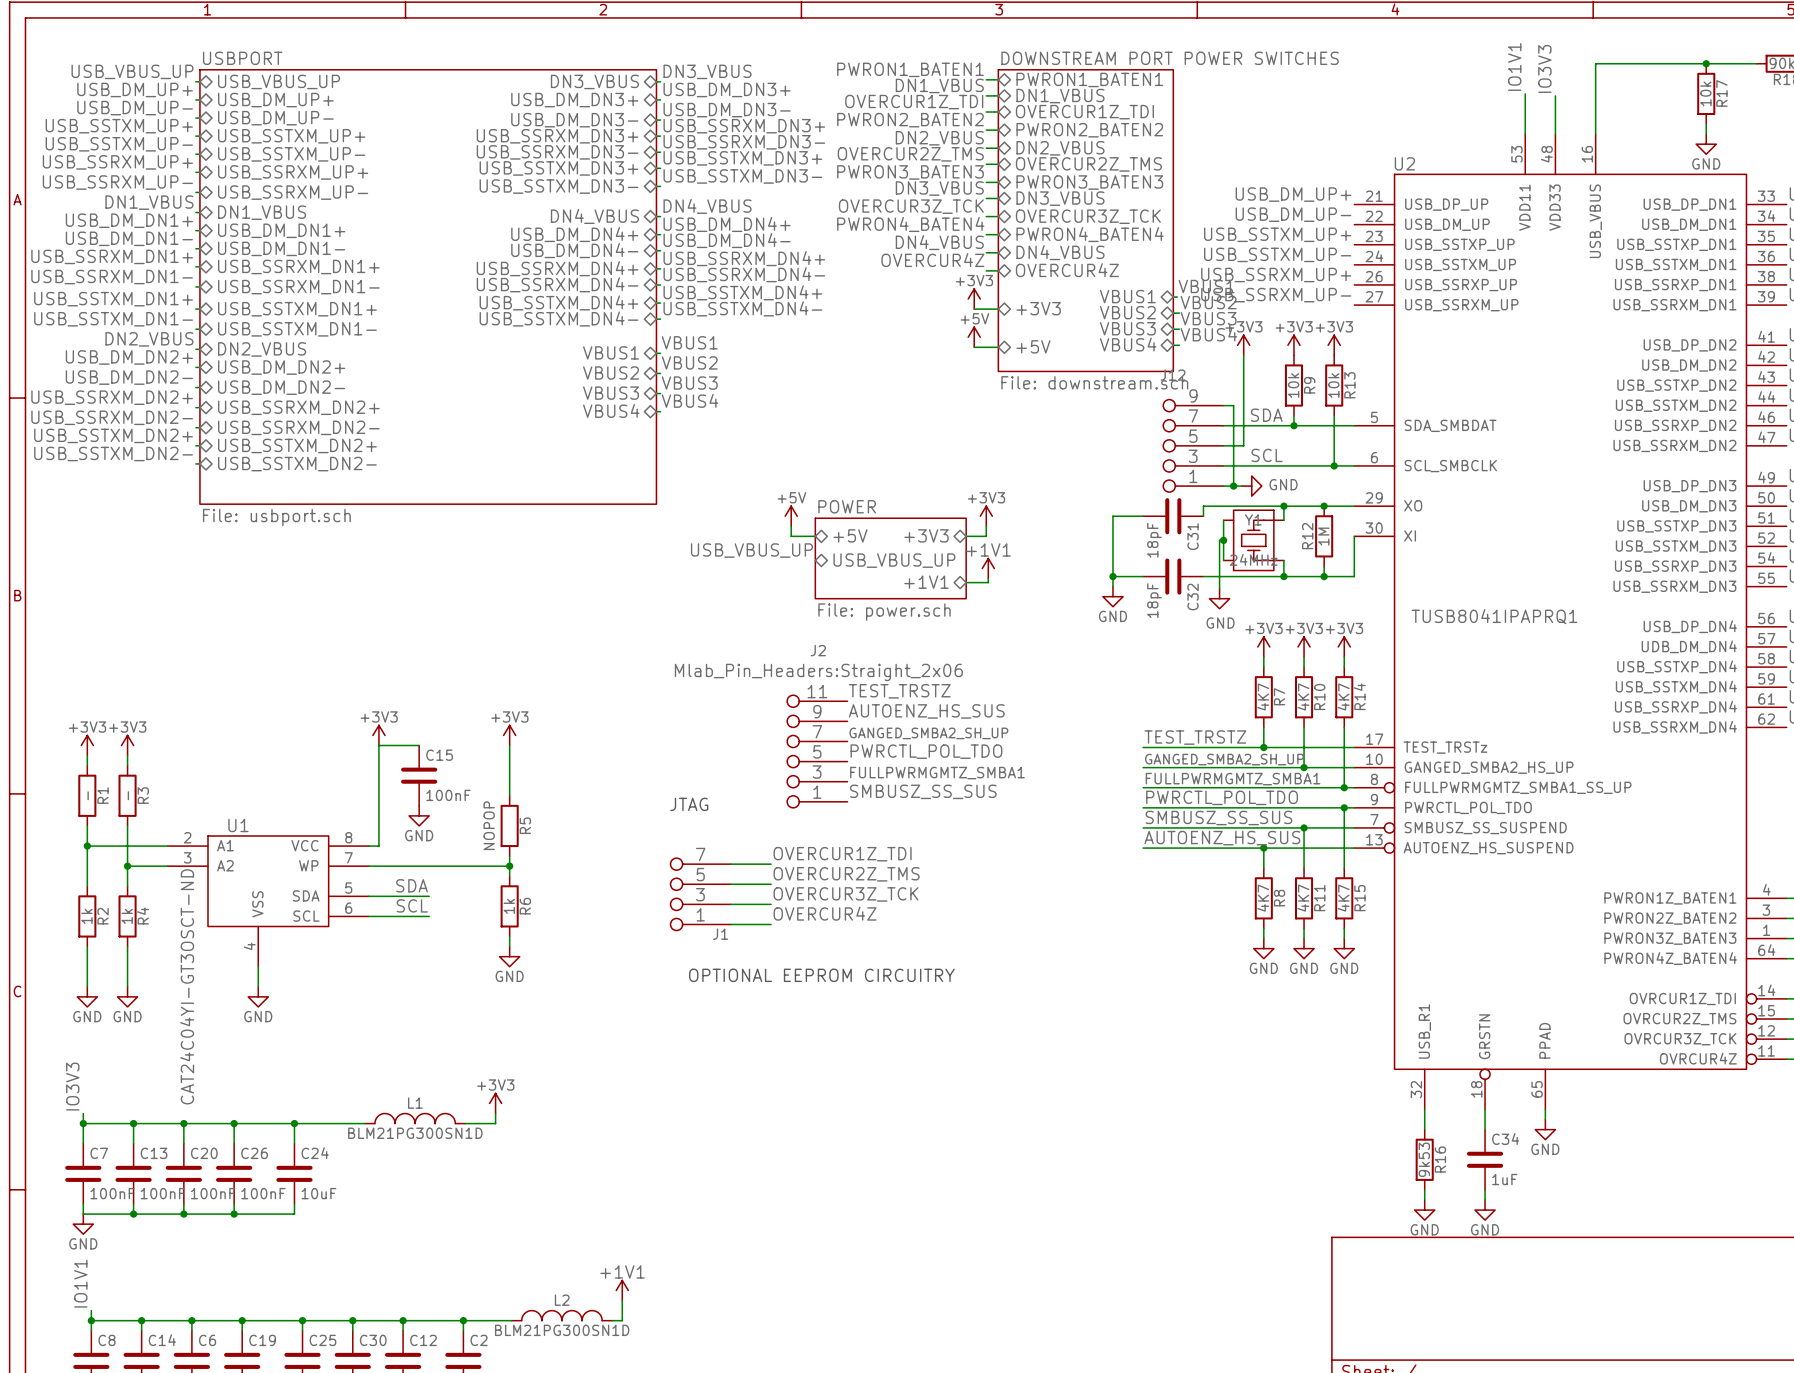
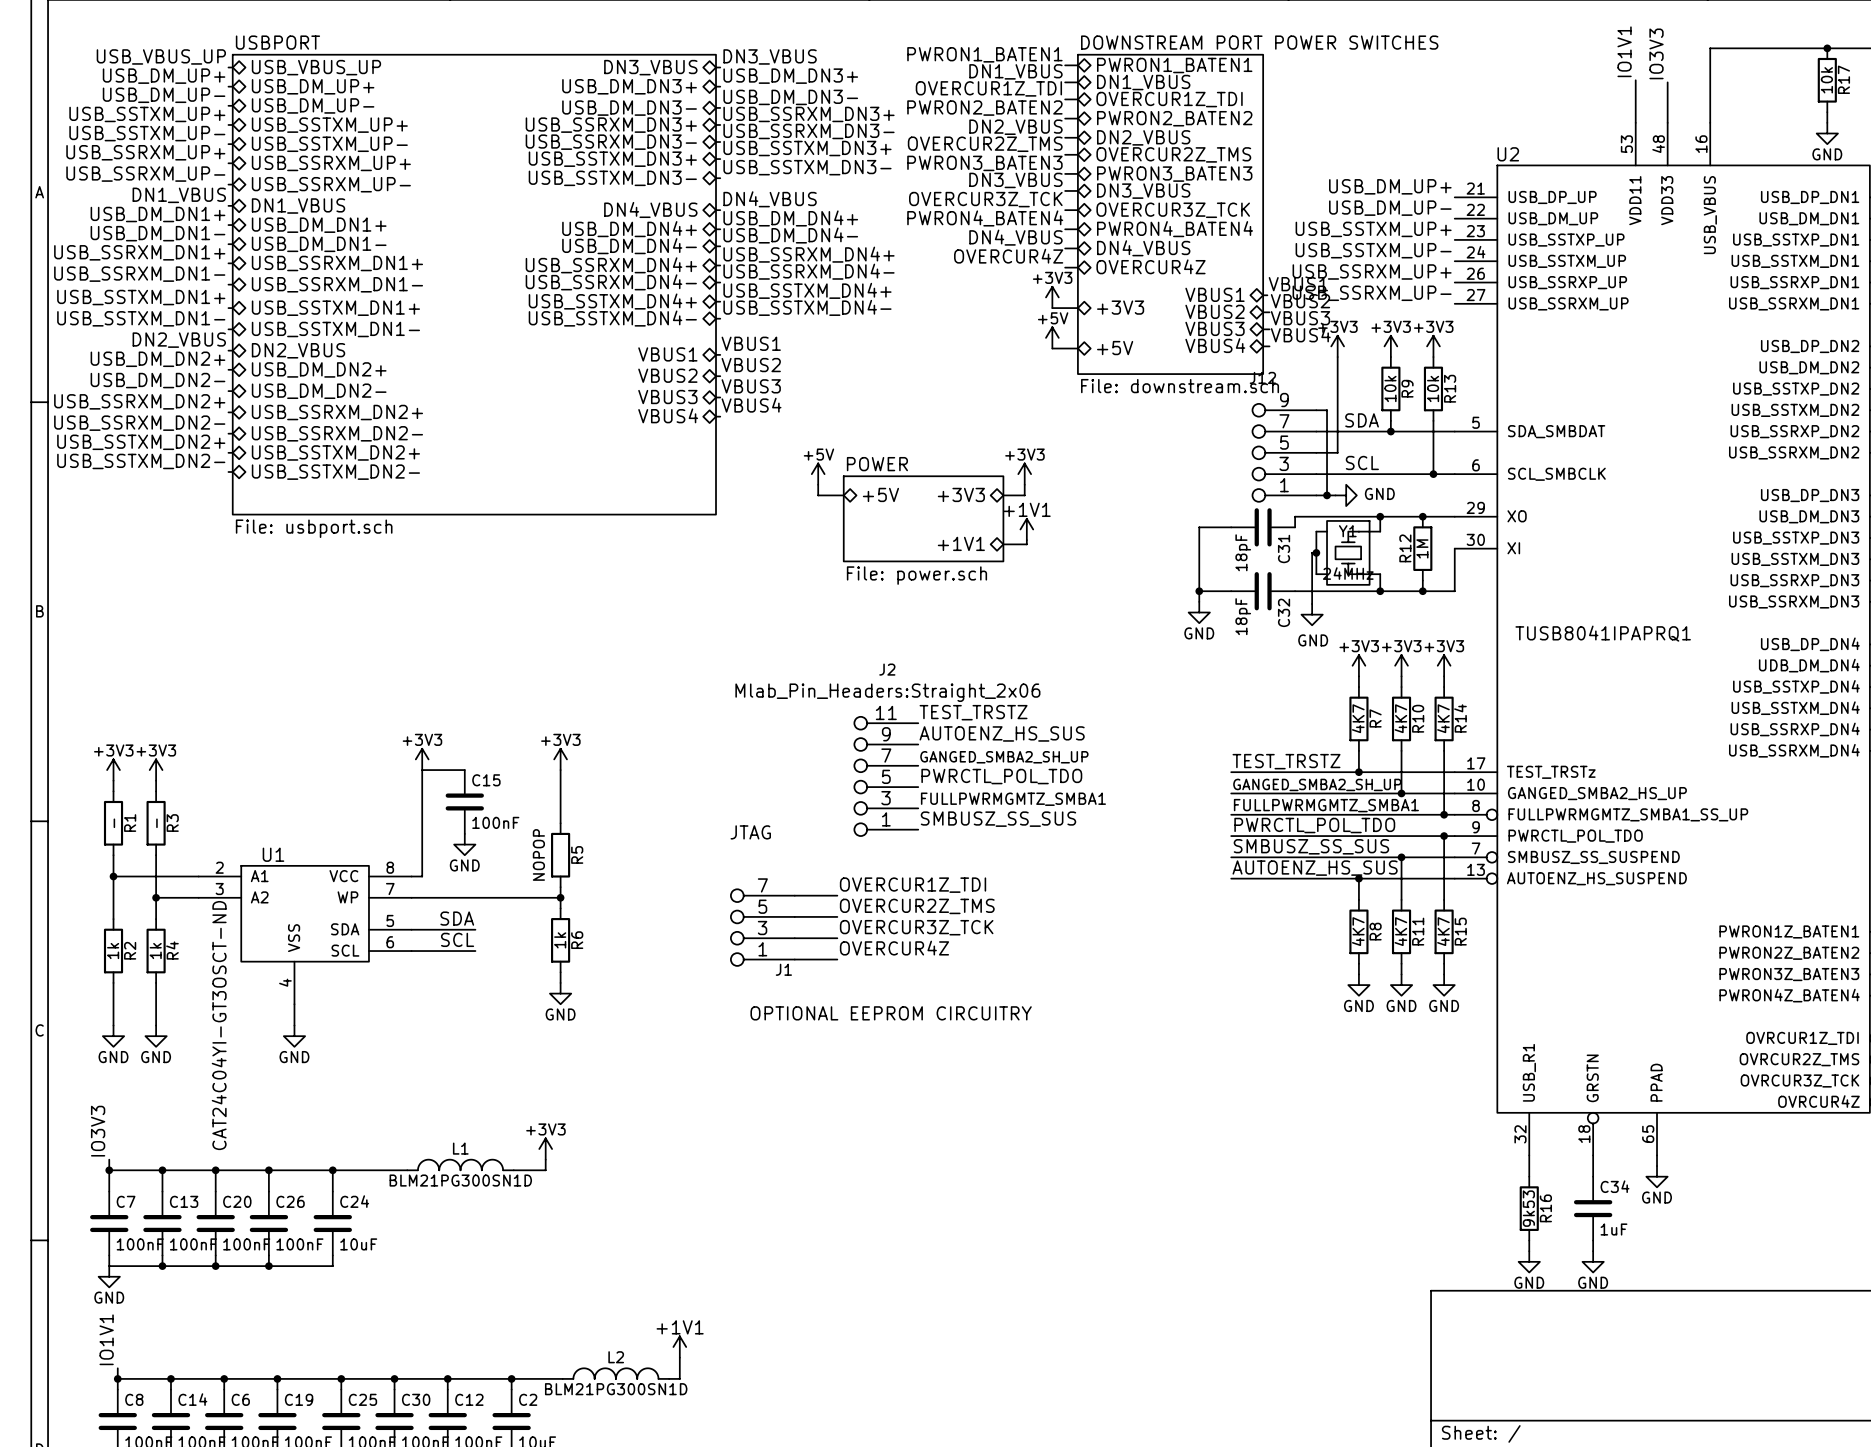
power symbol position: +5V (791, 516) -> +5V (818, 474)
power symbol position: +3V3 (986, 516) -> +3V3 (1024, 474)
wire: (791, 526) (791, 536) (815, 536) -> (818, 484) (818, 495) (843, 495)
wire: (986, 526) (986, 536) (966, 536) -> (1024, 484) (1024, 495) (1003, 495)
sheet pin position: +5V (850, 535) -> +5V (880, 494)
sheet pin position: +3V3 (926, 535) -> +3V3 (961, 494)
label: USB_VBUS_UP (751, 550) -> none
sheet POWER position: (890, 558) -> (923, 518)
sheet pin: USB_VBUS_UP (894, 560) -> none
power symbol position: +1V1 (988, 568) -> +1V1 (1026, 529)
wire: (988, 578) (988, 582) (966, 582) -> (1026, 540) (1026, 544) (1003, 544)
sheet pin position: +1V1 (926, 582) -> +1V1 (961, 543)

